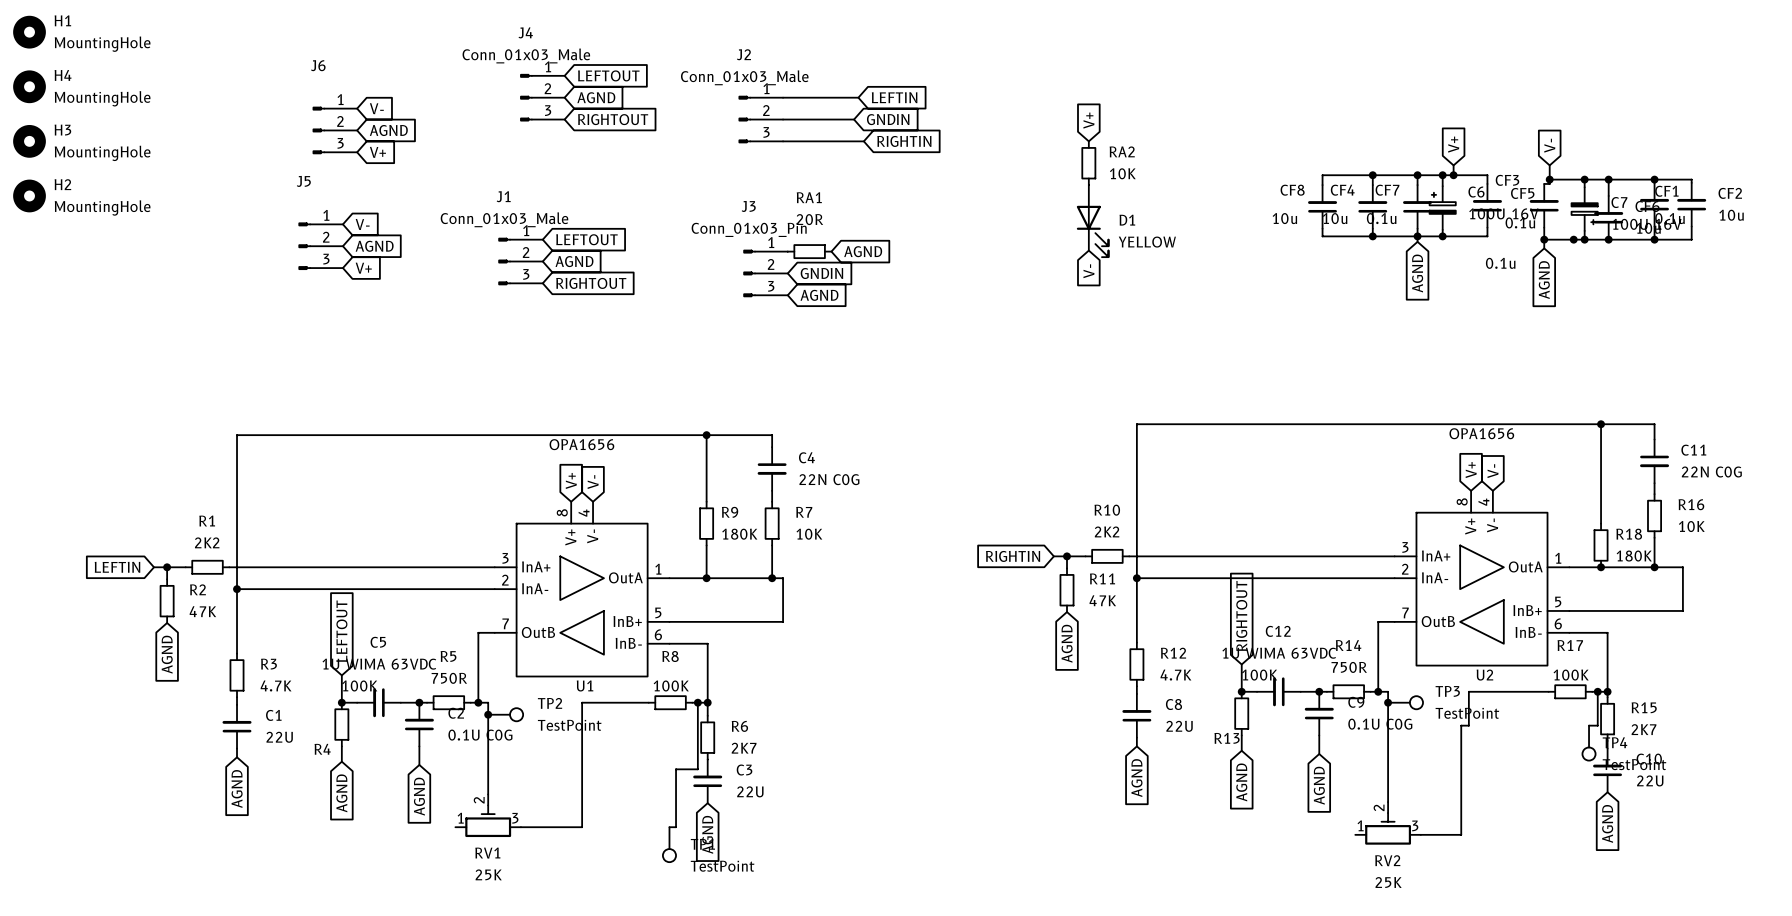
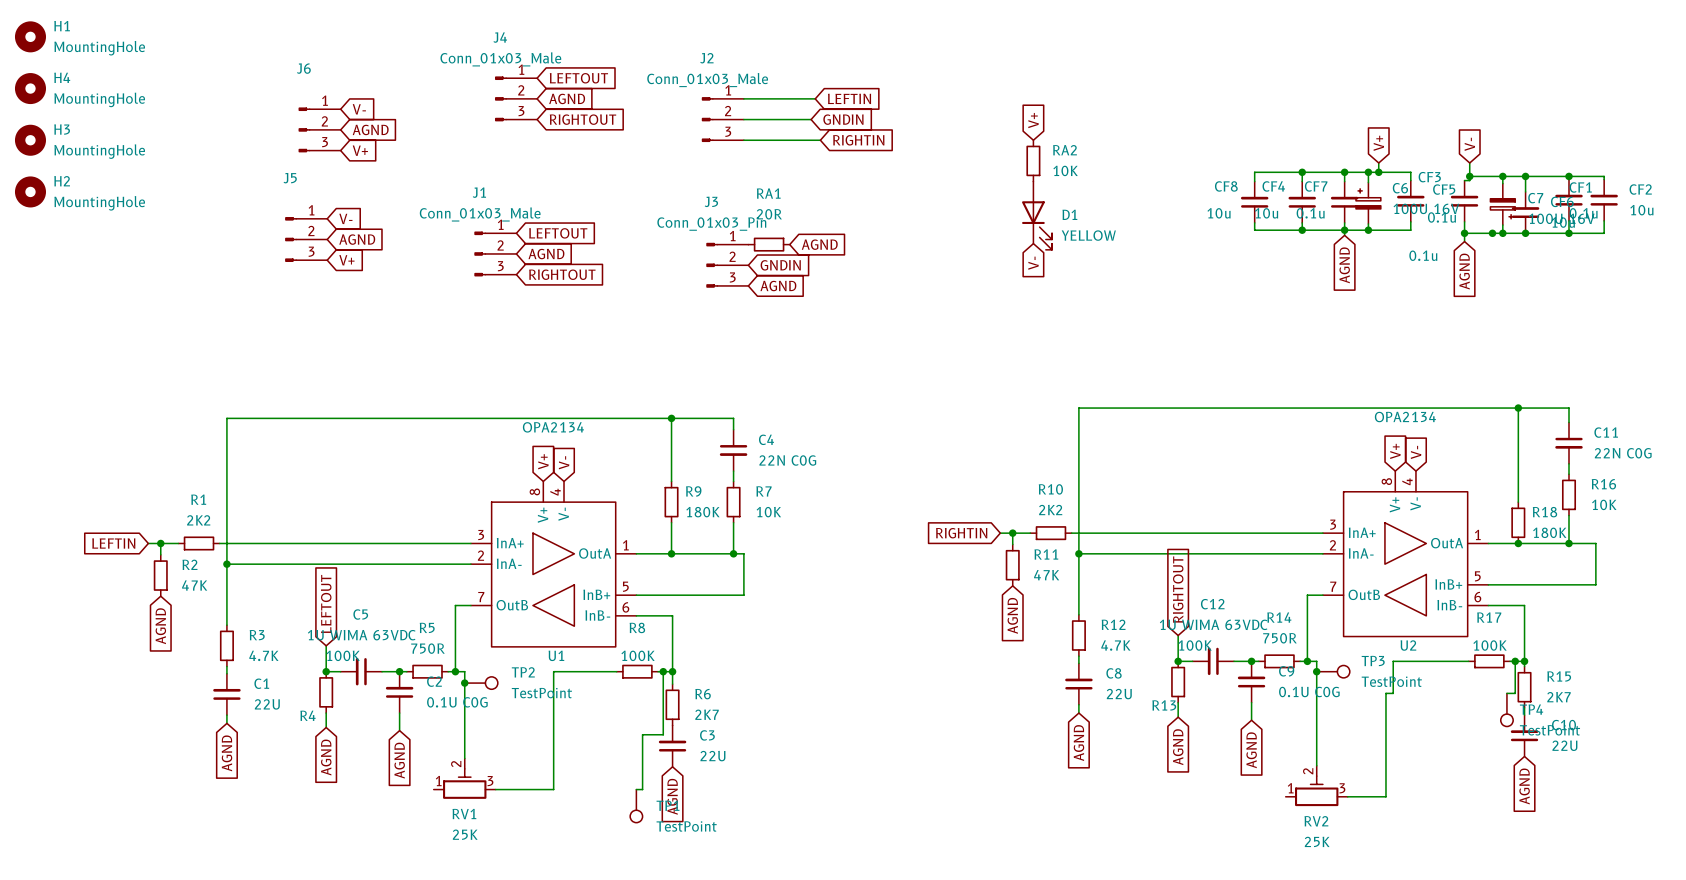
U2 value: OPA1656 (1481, 433) -> OPA2134 (1405, 417)
U1 value: OPA1656 (581, 444) -> OPA2134 (553, 427)

